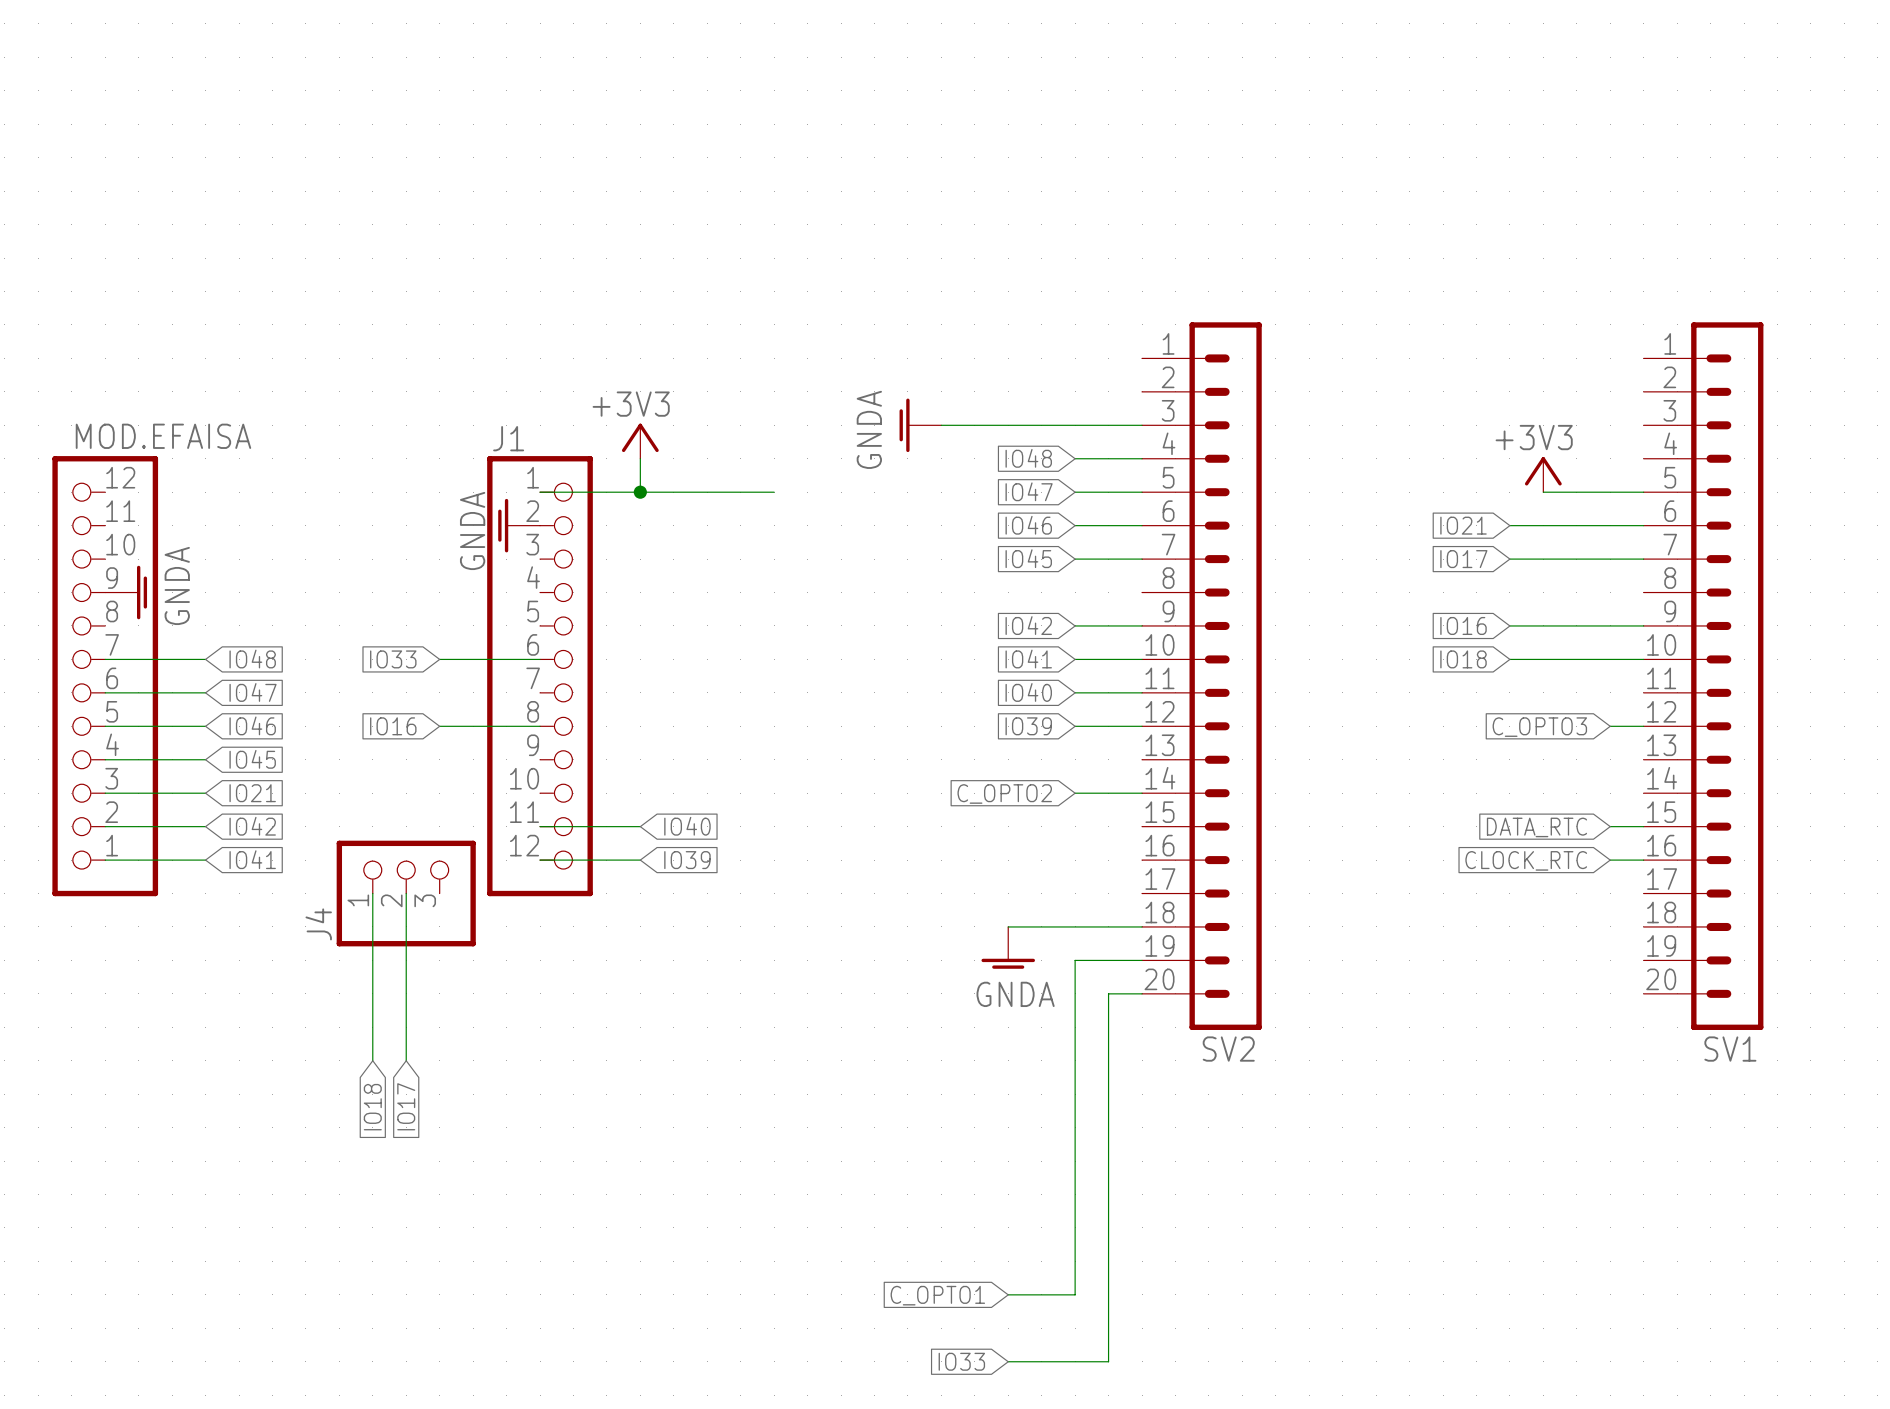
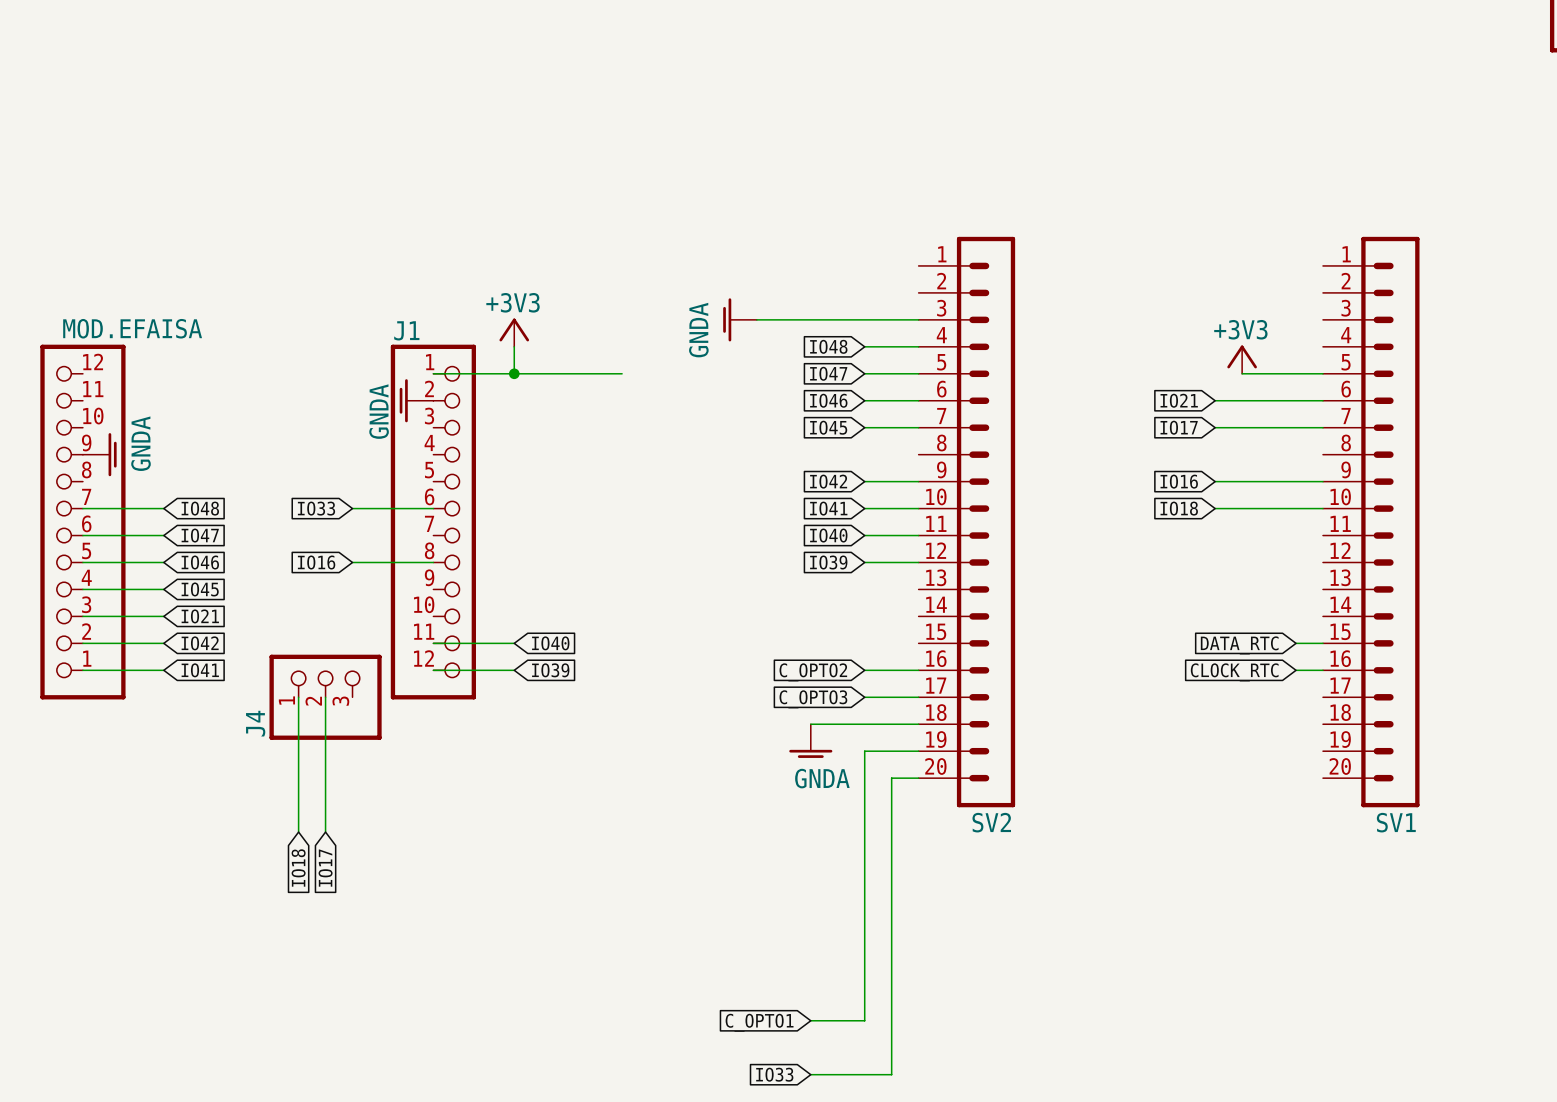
wire: (1610, 726) (1643, 726) -> none
global label: C_OPTO3 (1539, 727) -> none
global label position: C_OPTO2 (1004, 793) -> C_OPTO2 (813, 672)
wire: (1075, 793) (1142, 793) -> (864, 670) (918, 670)
wire: none -> (864, 697) (918, 697)
global label: none -> C_OPTO3 (813, 699)

